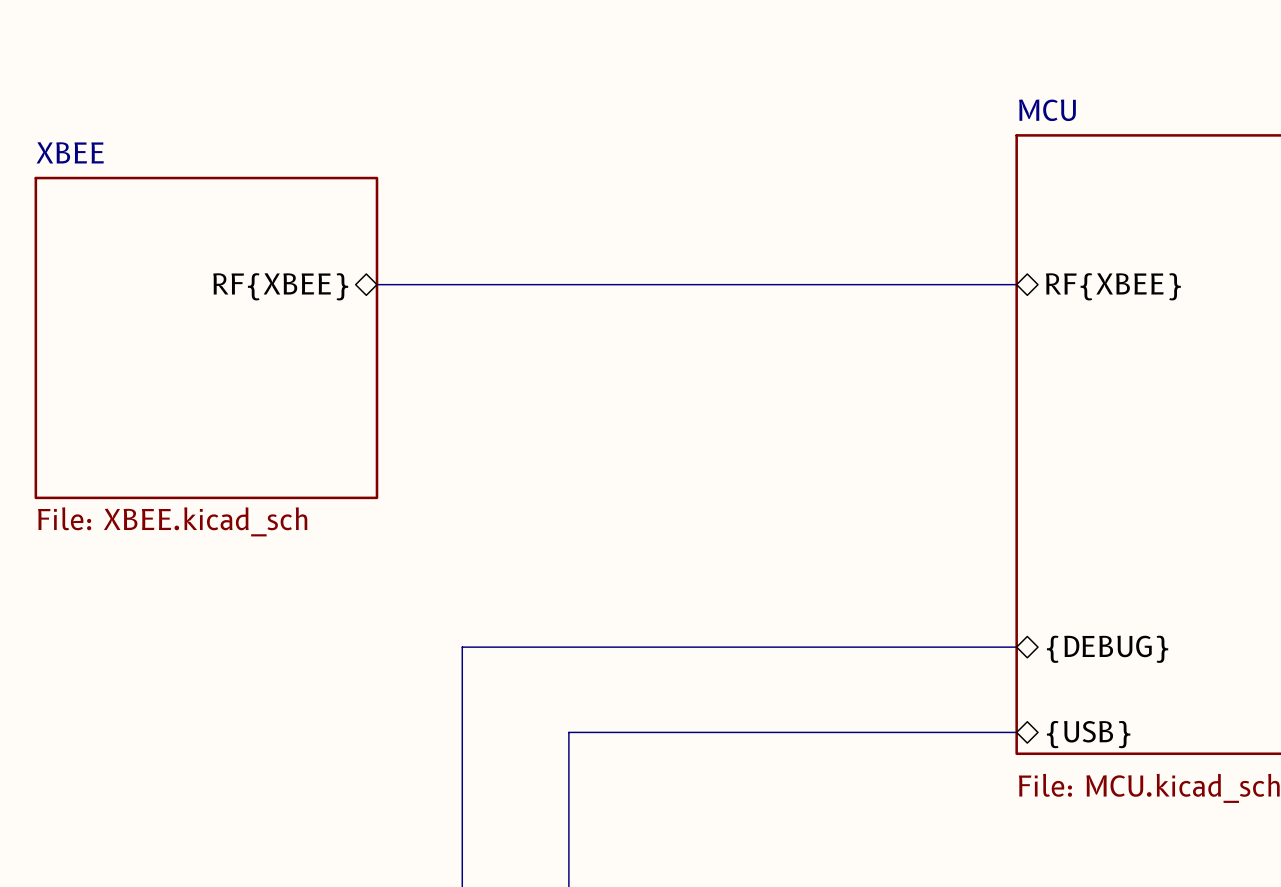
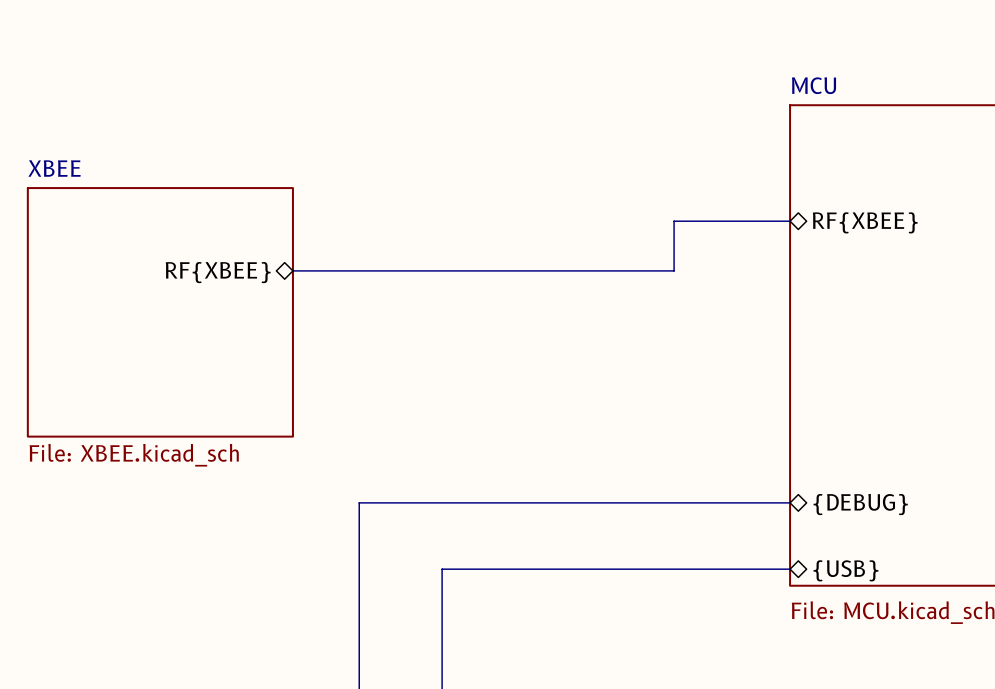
bus: (376, 284) (867, 284) -> (292, 270) (674, 270) (674, 221)
sheet pin position: RF{XBEE} (280, 286) -> RF{XBEE} (218, 272)
sheet XBEE position: (206, 337) -> (160, 312)

